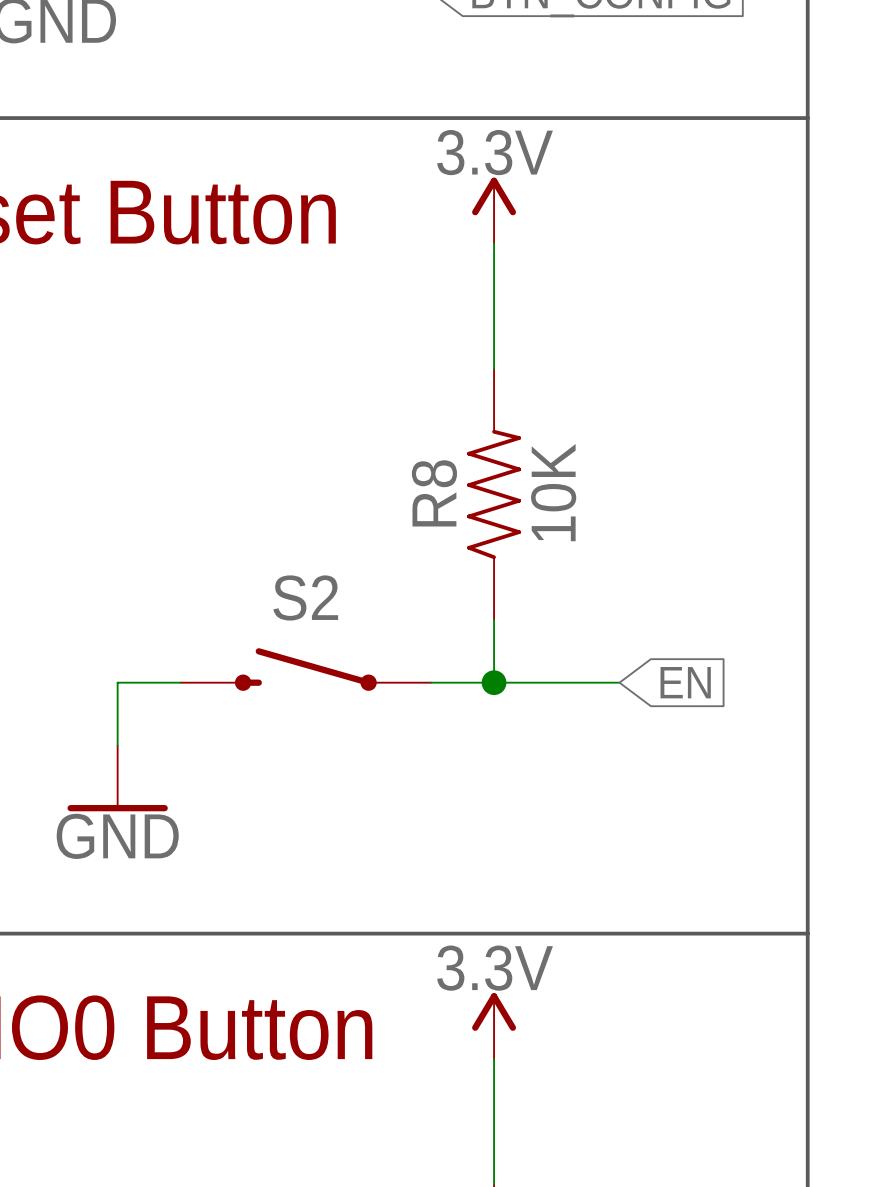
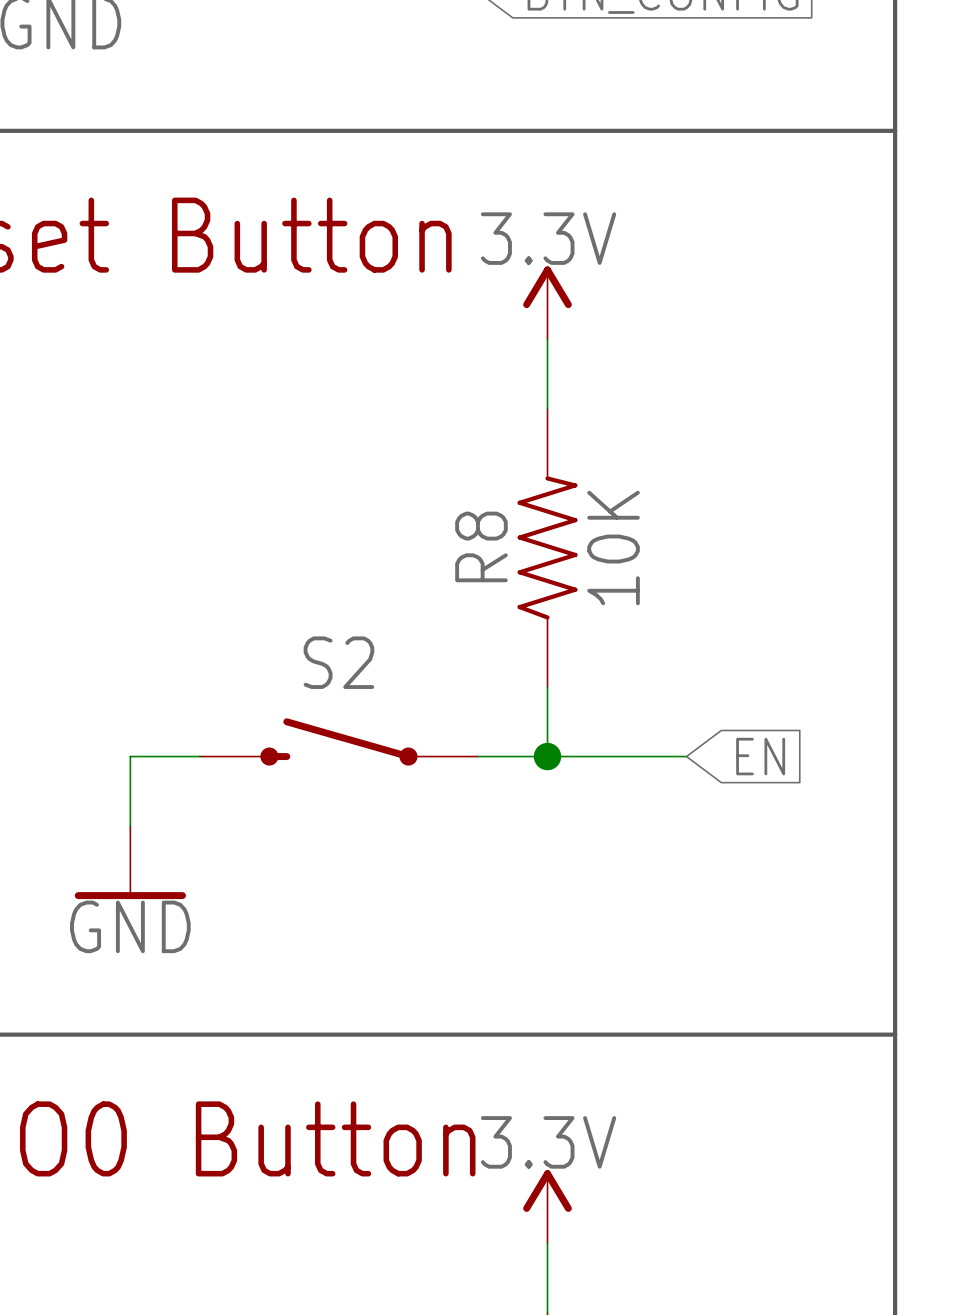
power symbol position: 3.3V (494, 210) -> 3.3V (547, 302)
power symbol position: 3.3V (494, 1026) -> 3.3V (547, 1206)

